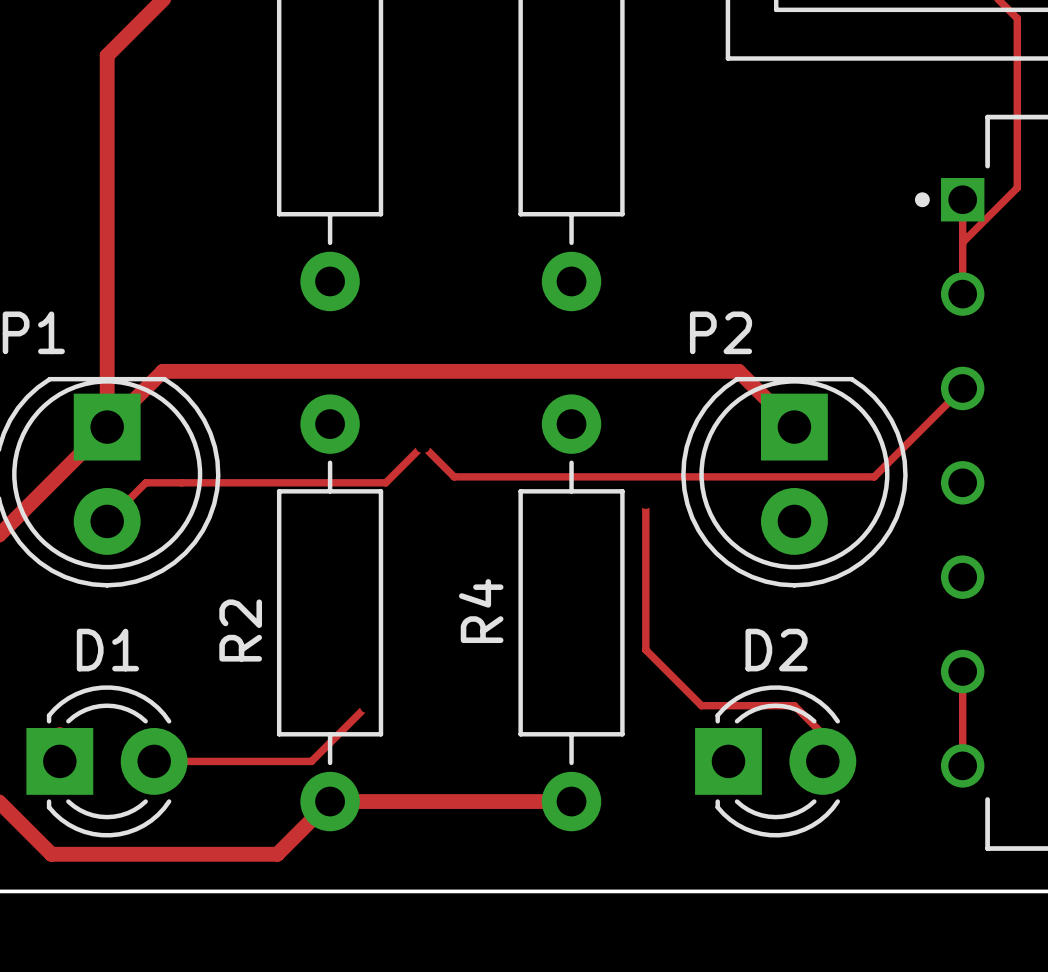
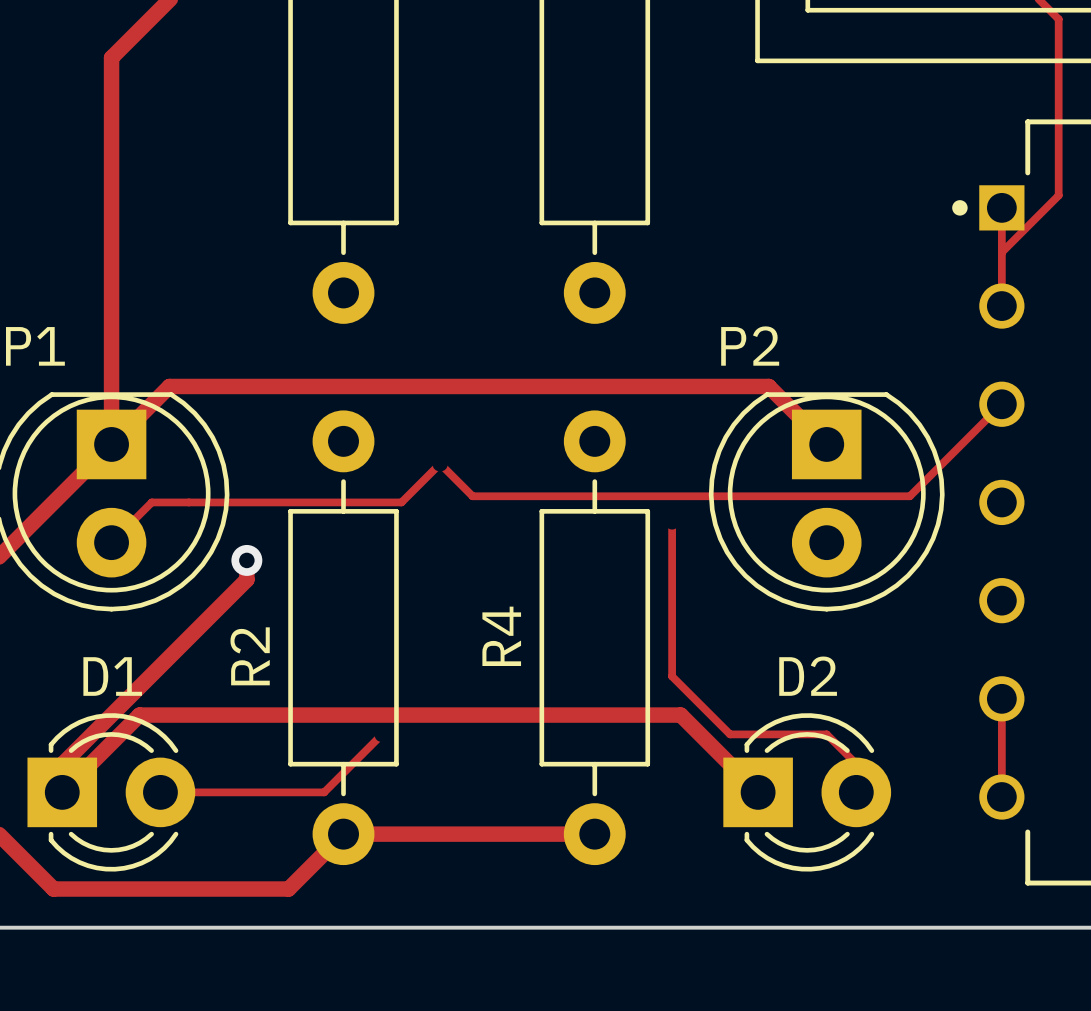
track: none -> (246, 560) (246, 579) (62, 764)
via: none -> (246, 560)
track: none -> (62, 792) (139, 715) (680, 715) (758, 792)

